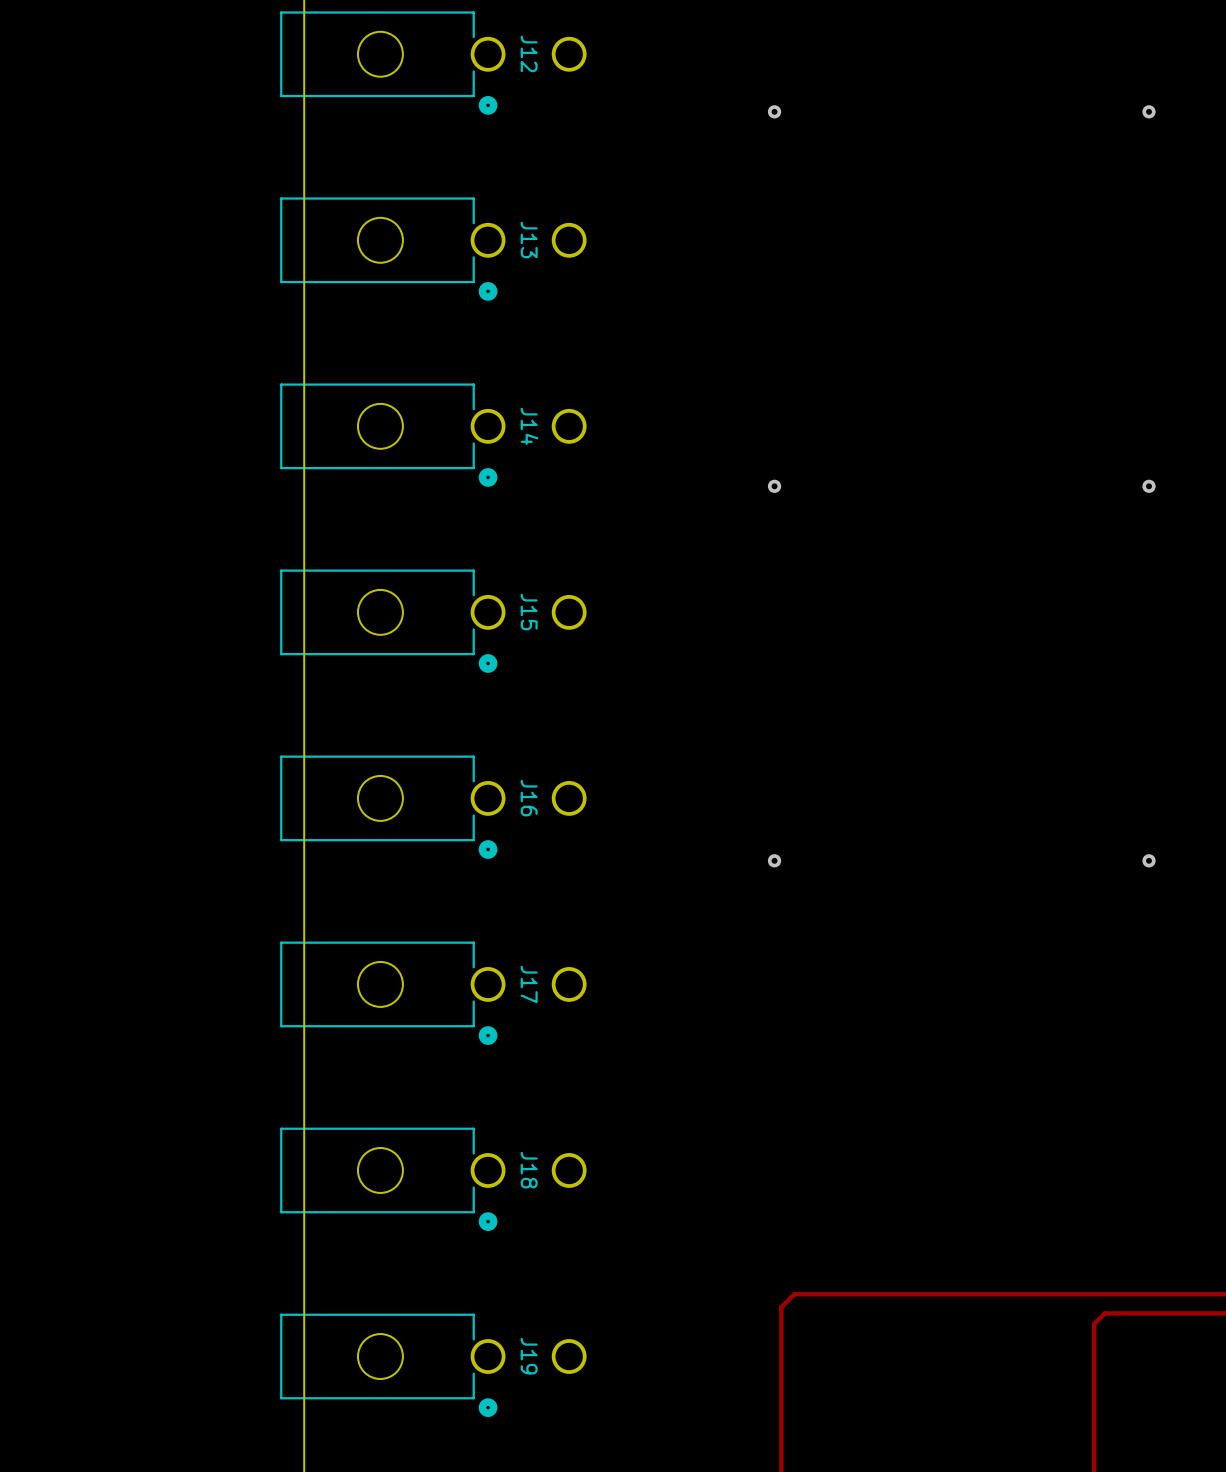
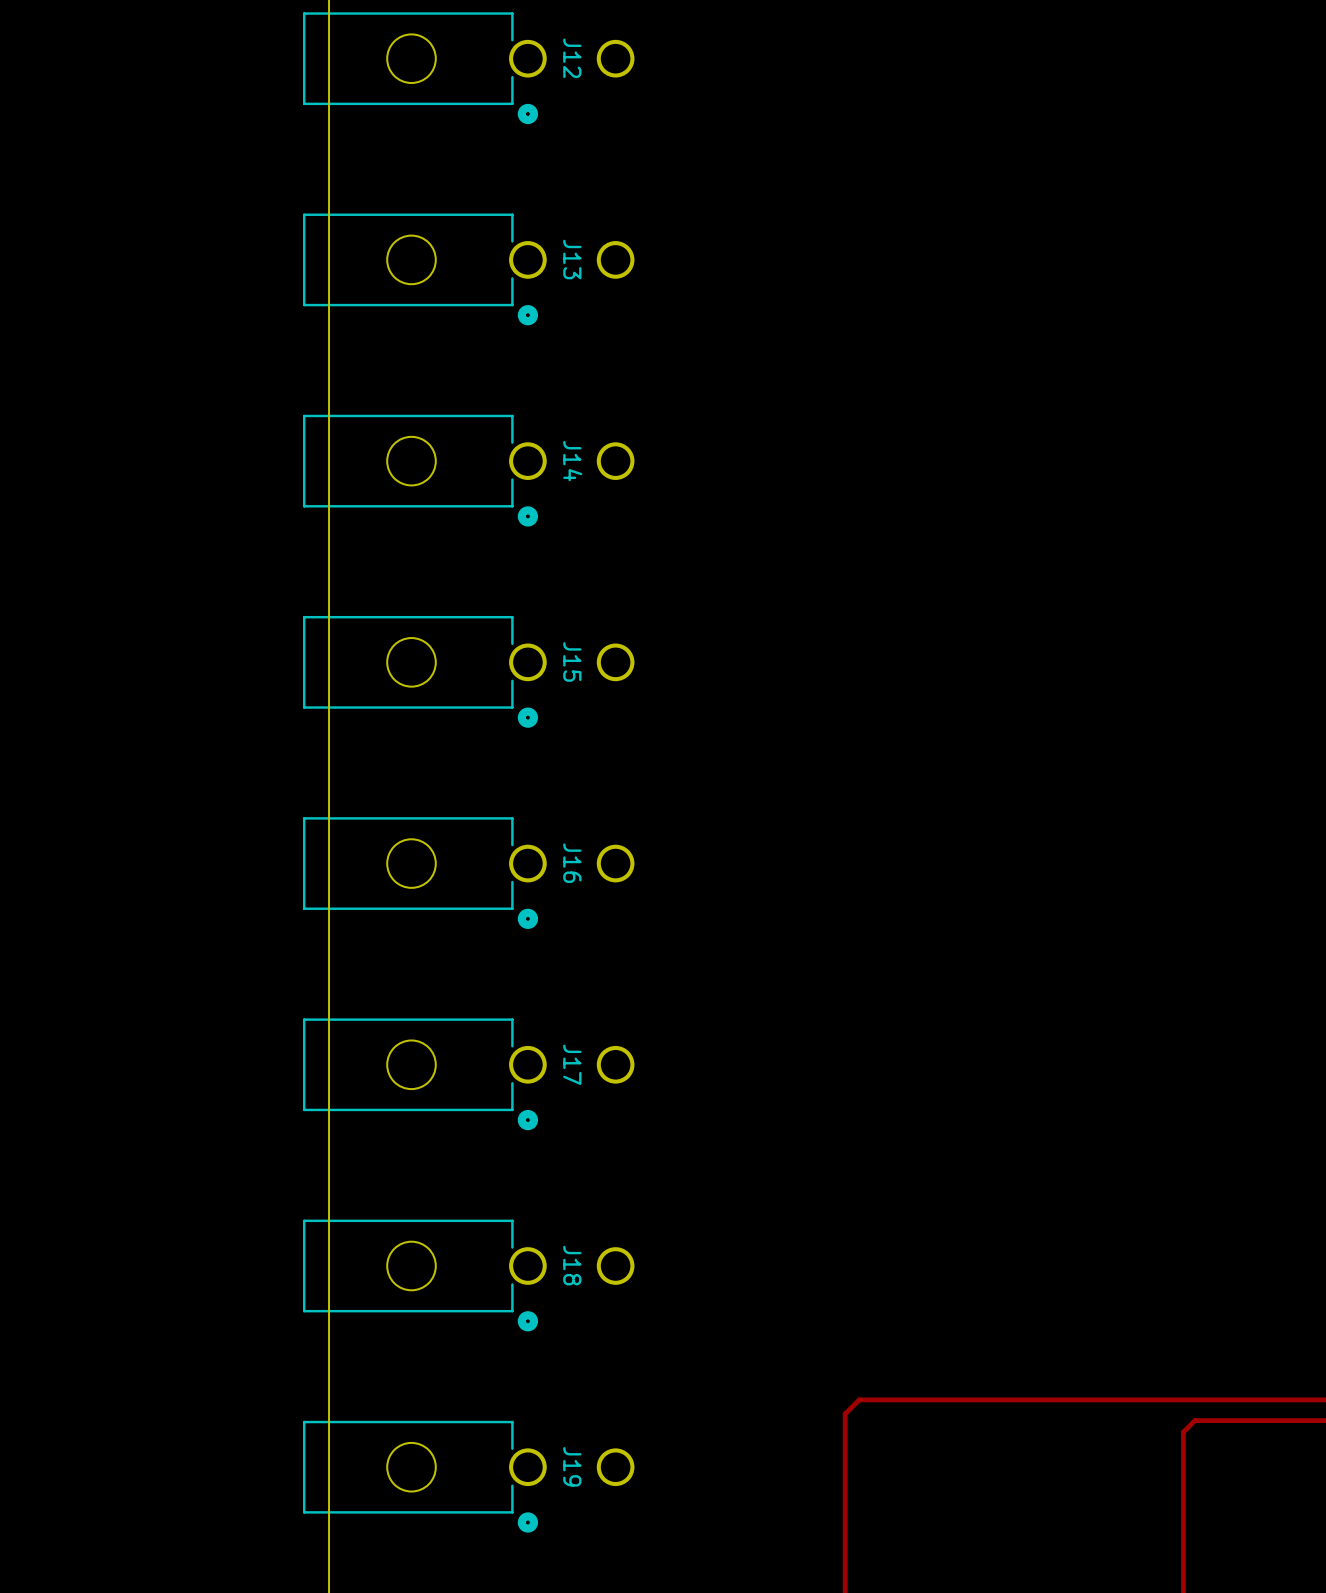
via: (774, 111) -> none
via: (1149, 111) -> none
via: (774, 486) -> none
via: (1149, 486) -> none
via: (774, 860) -> none
via: (1149, 860) -> none

